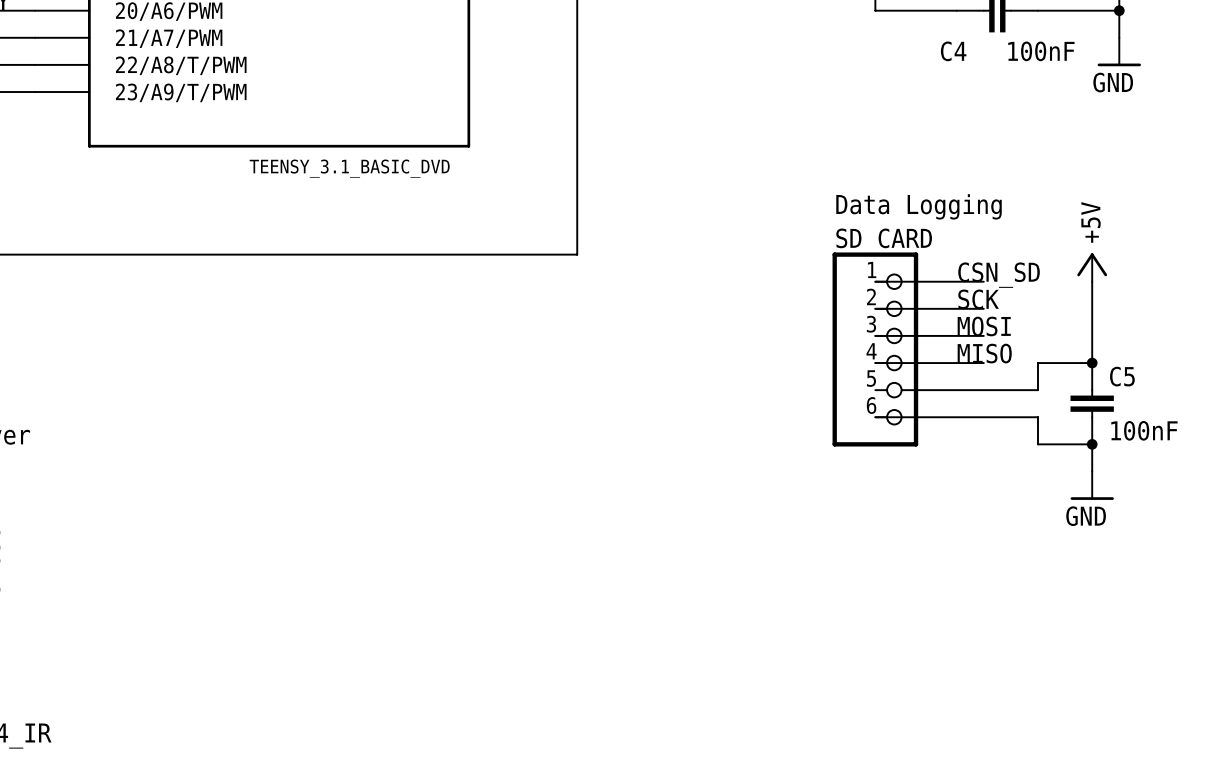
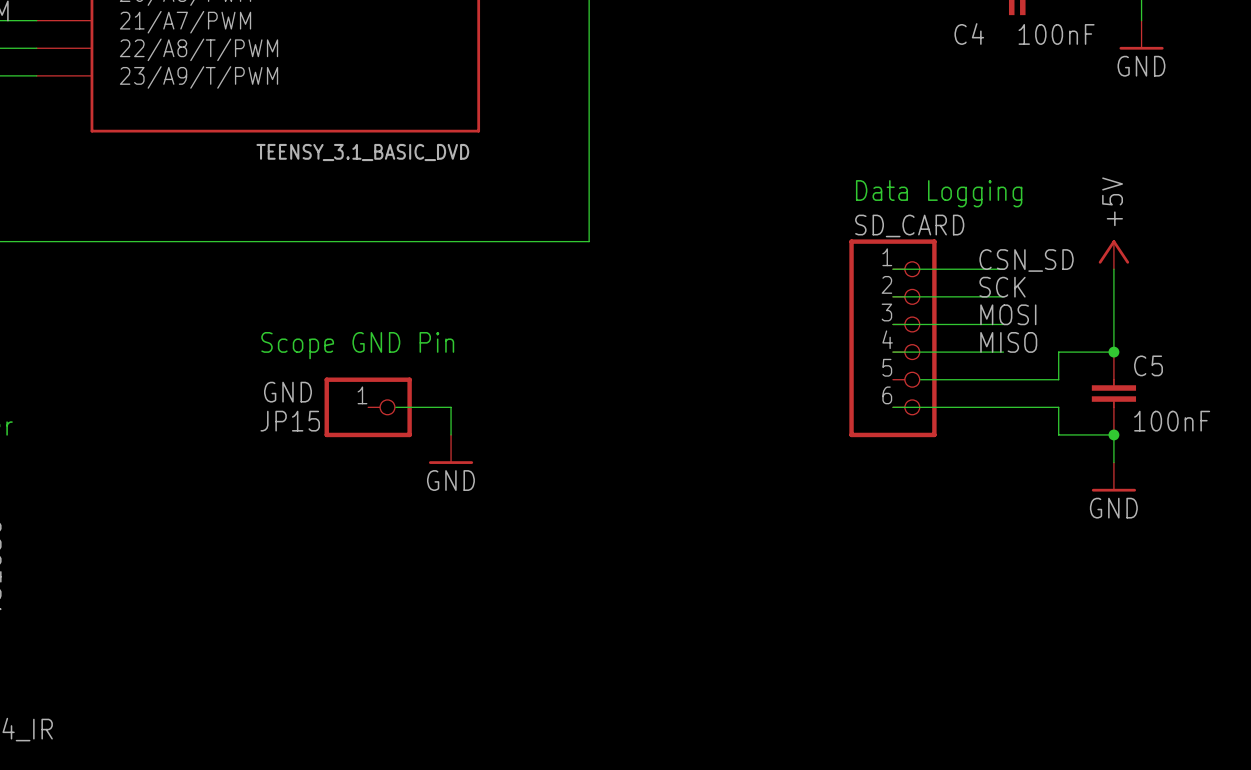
text: none -> Scope GND Pin (357, 345)
JP15: none -> GND (368, 407)
wire: none -> (395, 407) (451, 407) (451, 434)
power symbol: none -> GND (451, 449)

